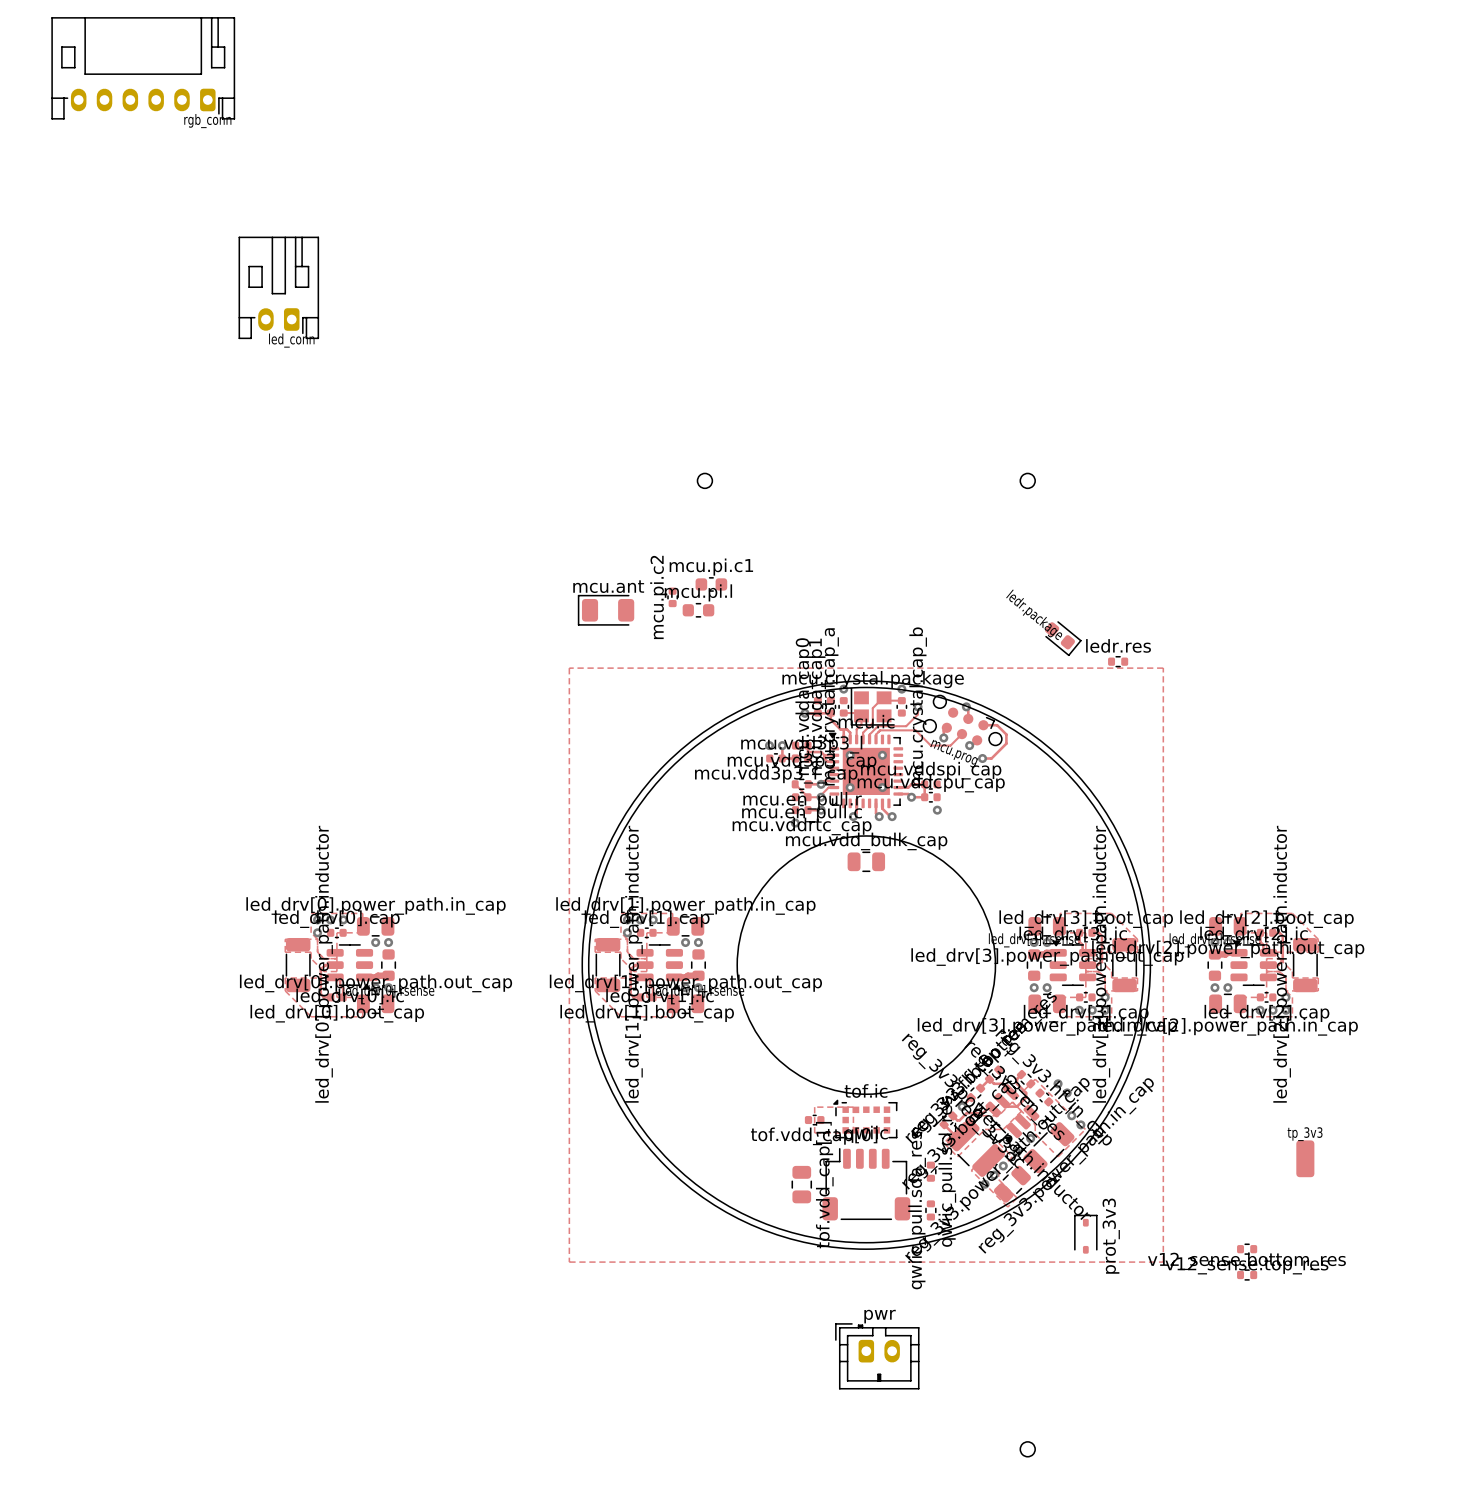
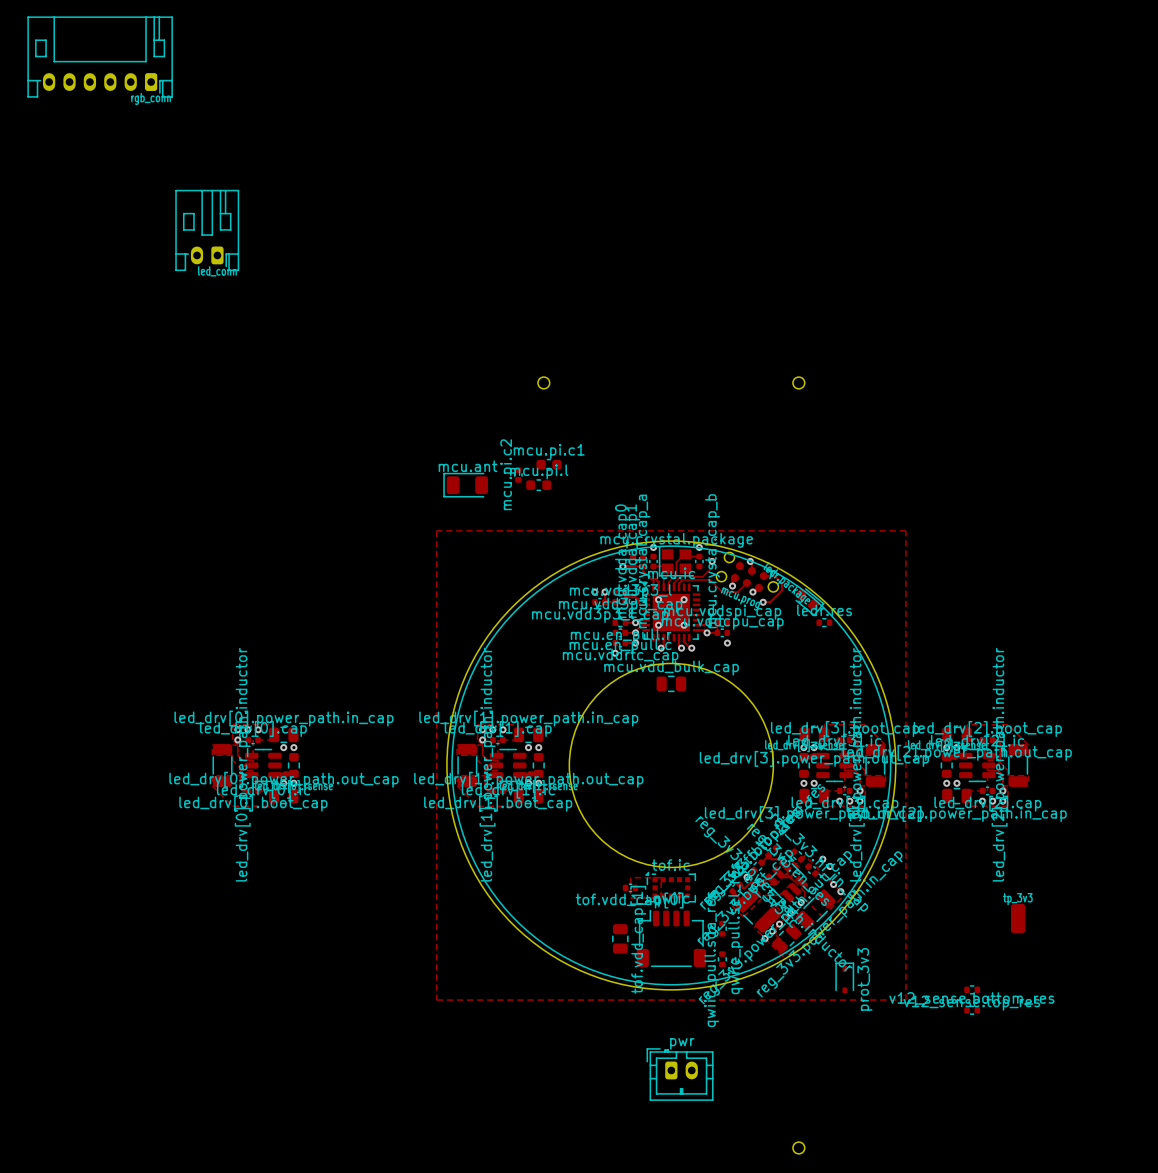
ledr.package position: (1063, 638) -> (809, 602)
ledr.res position: (1118, 661) -> (824, 622)

